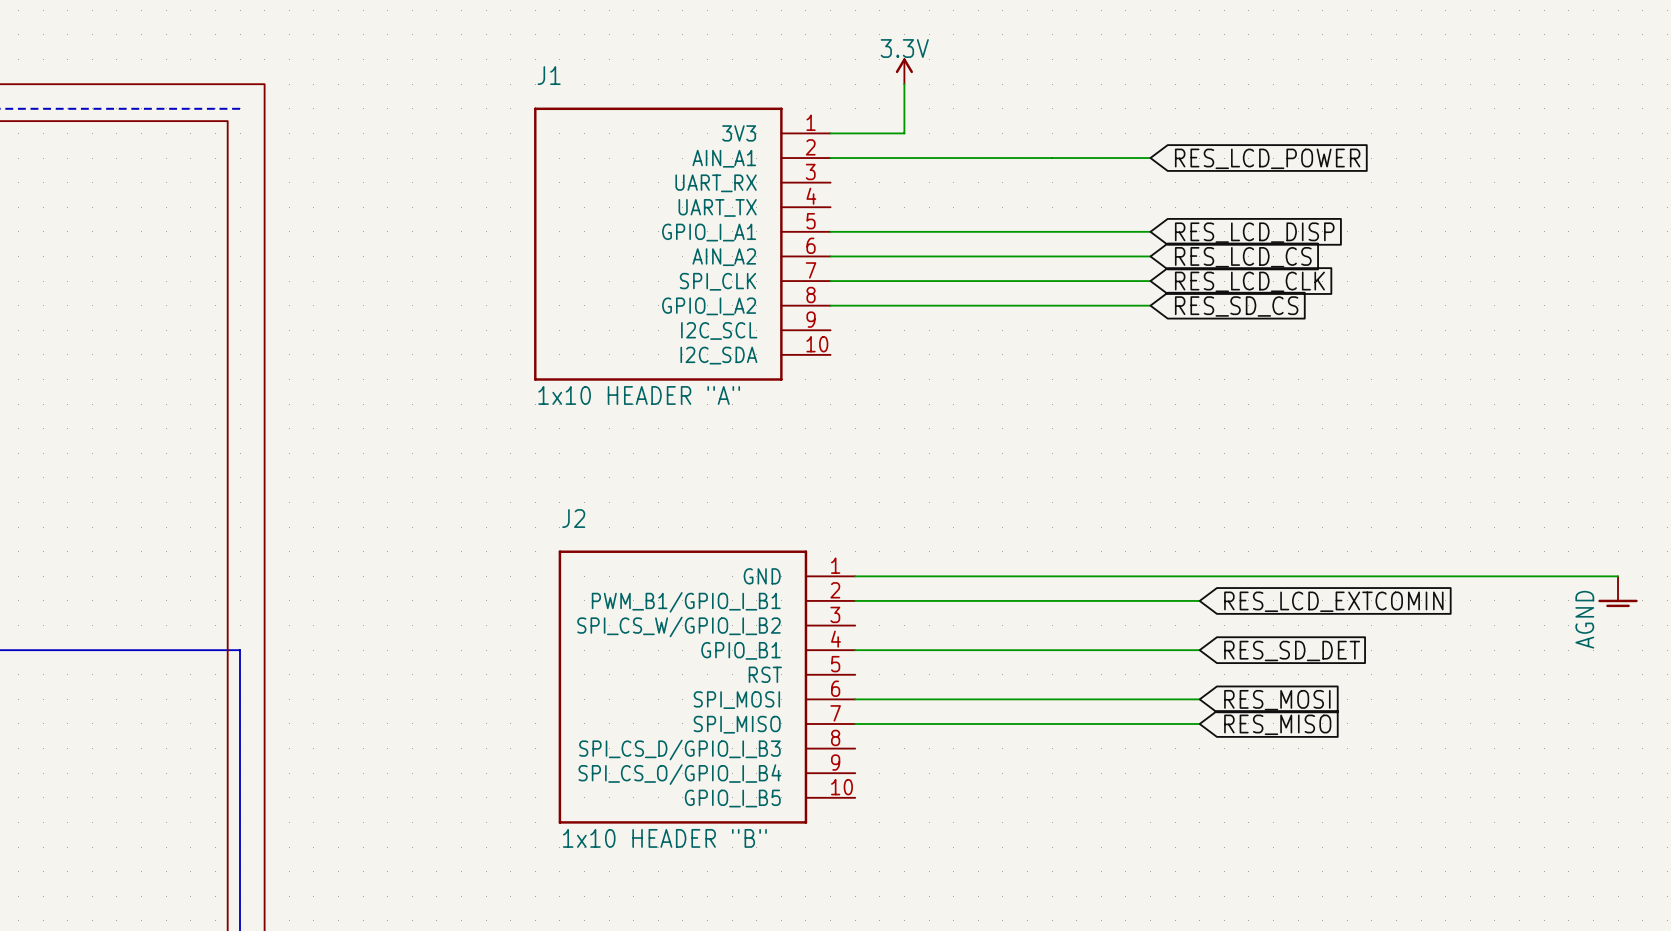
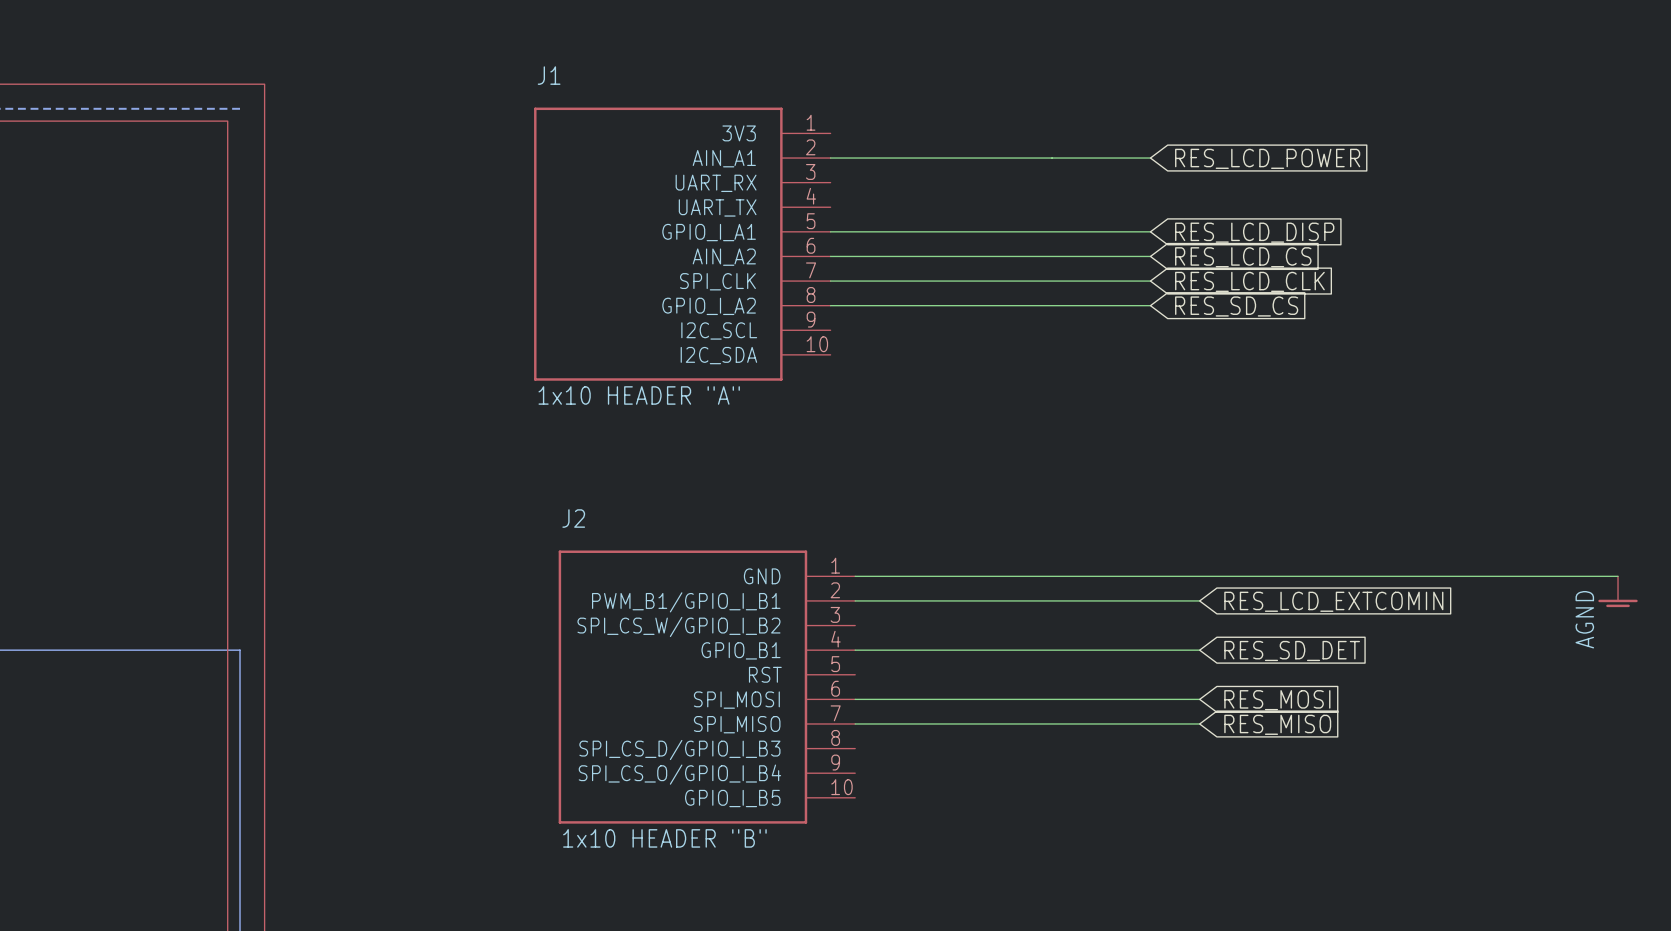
power symbol: 3.3V (904, 71) -> none
wire: (904, 84) (904, 133) (830, 133) -> none

